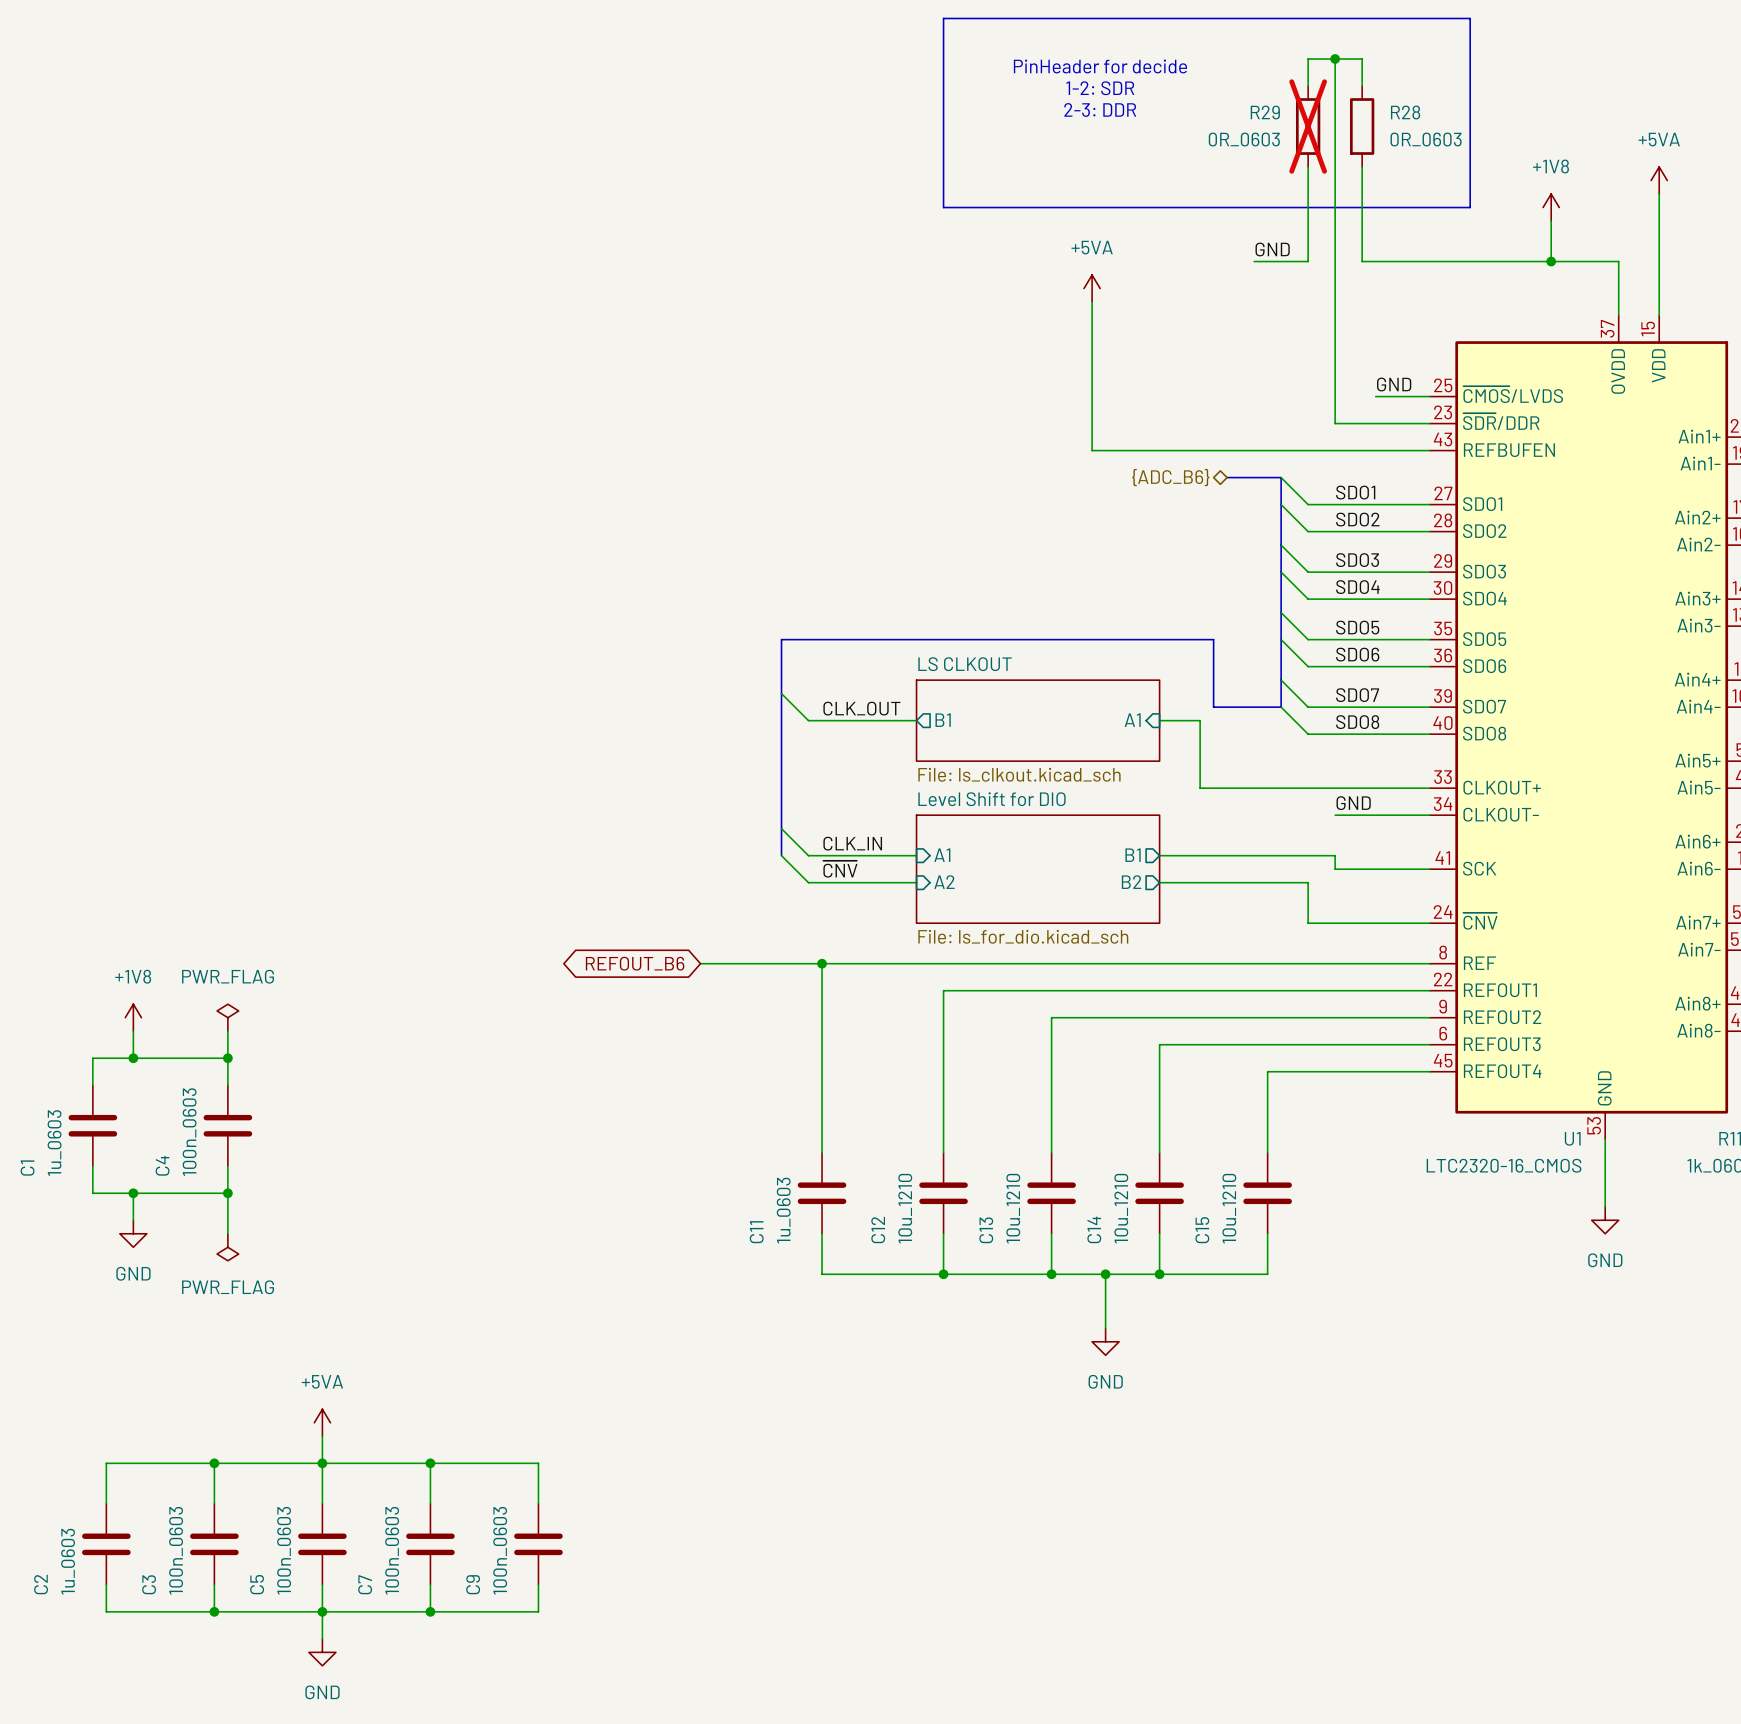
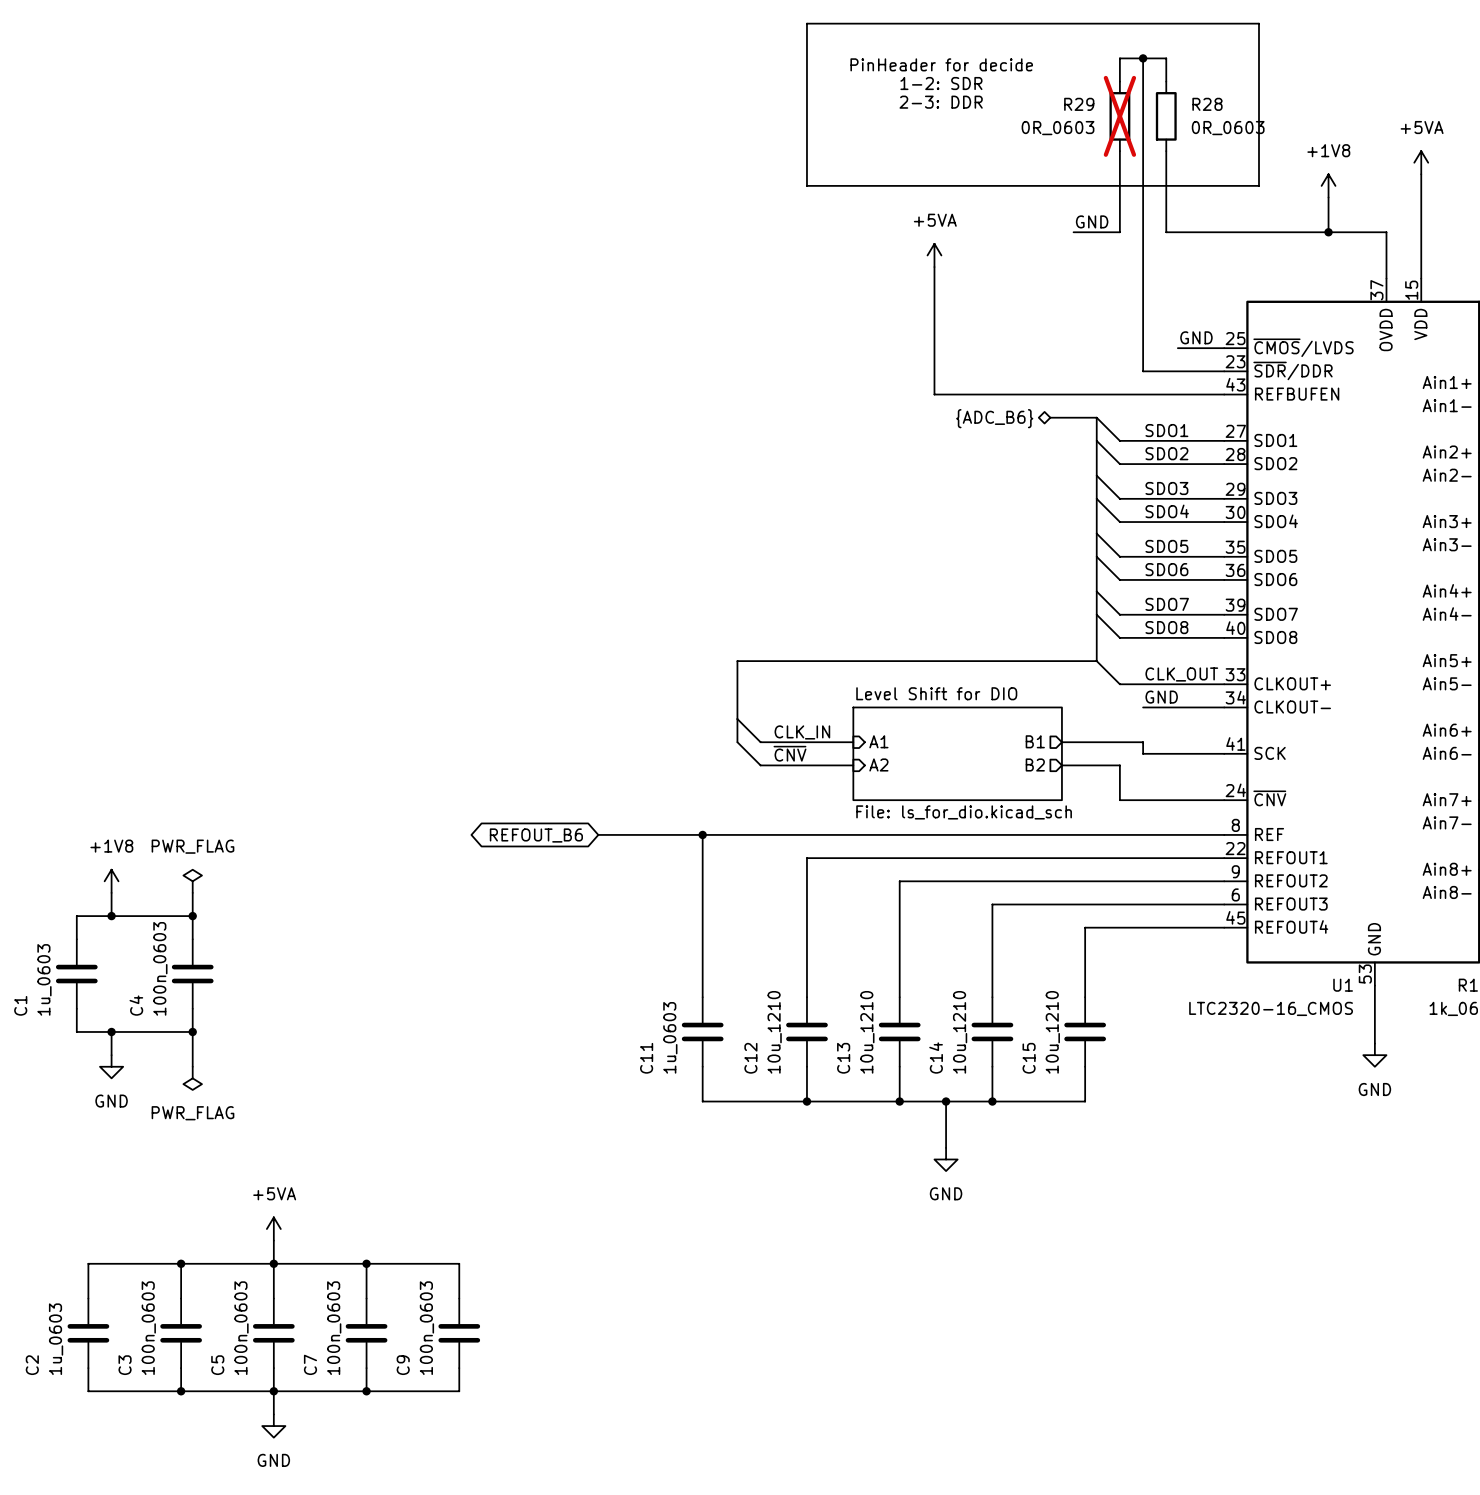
wire: (781, 693) (808, 720) (916, 720) -> none
bus: (1281, 707) (1213, 707) (1213, 639) (781, 639) (781, 855) -> (1096, 614) (1096, 661) (737, 661) (737, 742)
label: CLK_OUT (861, 708) -> none
sheet pin: B1 (943, 720) -> none
sheet LS CLKOUT: File: ls_clkout.kicad_sch (1038, 720) -> none
sheet pin: A1 (1132, 720) -> none
wire: (1159, 720) (1200, 720) (1200, 788) (1308, 788) -> (1096, 661) (1119, 684)
label: none -> CLK_OUT (1181, 674)
wire: (781, 828) (808, 855) (889, 855) -> (737, 719) (760, 742)
label position: CLK_IN (852, 843) -> CLK_IN (802, 732)
wire: (781, 855) (808, 882) (889, 882) -> (737, 742) (760, 765)
sheet pin position: A1 (942, 855) -> A1 (878, 741)
sheet pin position: B1 (1133, 855) -> B1 (1035, 741)
wire: (1159, 855) (1240, 855) -> (783, 742) (853, 742)
label position: ~{CNV} (840, 869) -> ~{CNV} (789, 753)
sheet Level Shift for DIO position: (1038, 869) -> (957, 753)
sheet pin position: A2 (944, 882) -> A2 (878, 764)
sheet pin position: B2 (1131, 882) -> B2 (1035, 764)
wire: (1159, 882) (1240, 882) -> (783, 765) (853, 765)

